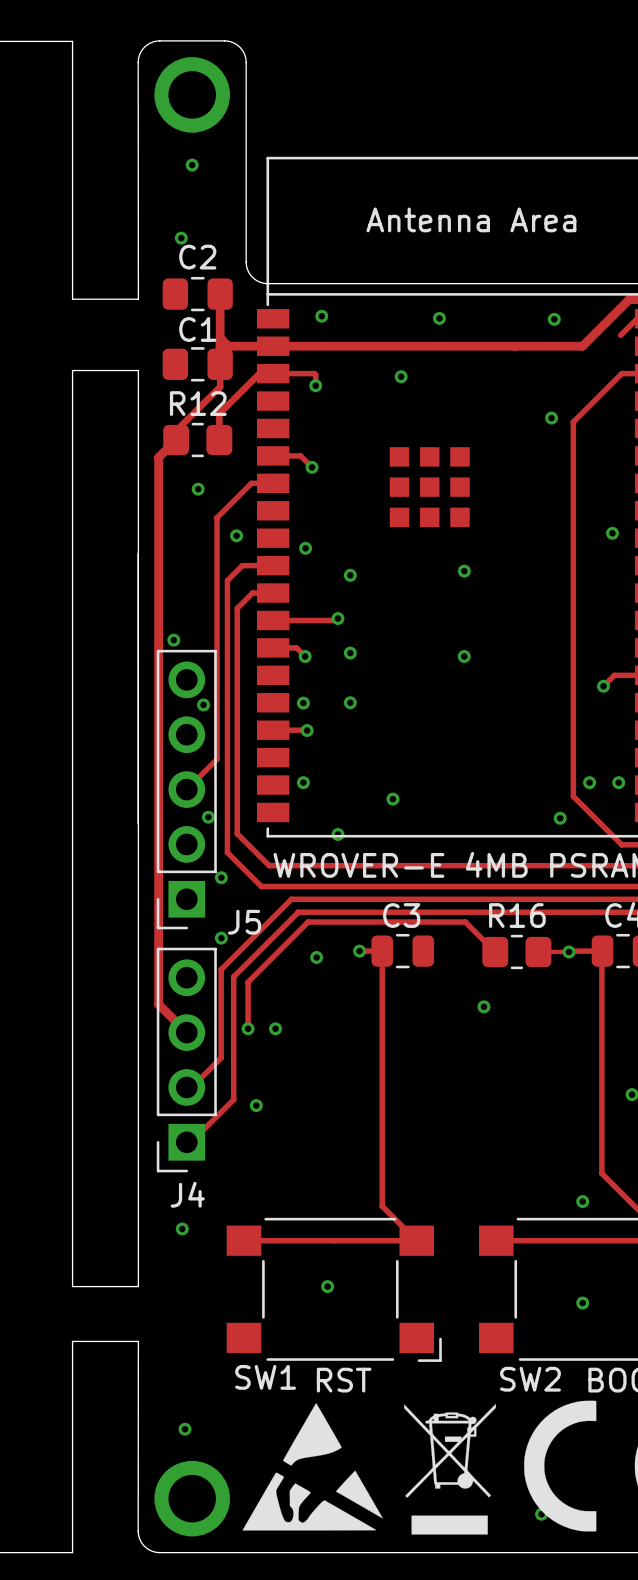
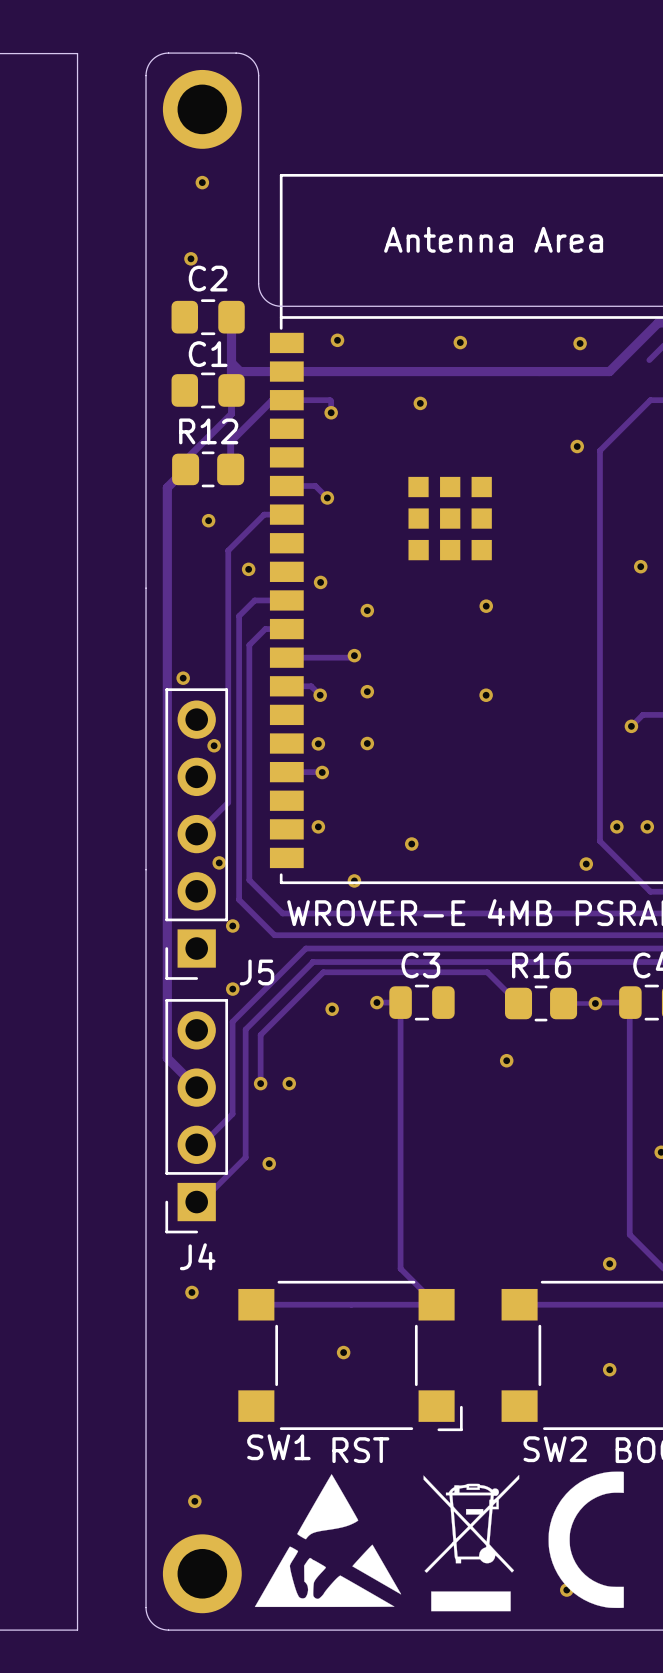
board edge: (138, 62) (138, 299) (72, 299) -> (146, 75) (146, 588)
board edge: (72, 370) (138, 370) (138, 1286) (72, 1286) -> (77, 396) (77, 322)
board edge: none -> (146, 869) (146, 1607)
board edge: (72, 1341) (138, 1341) (138, 1531) -> (77, 1409) (77, 1352)

